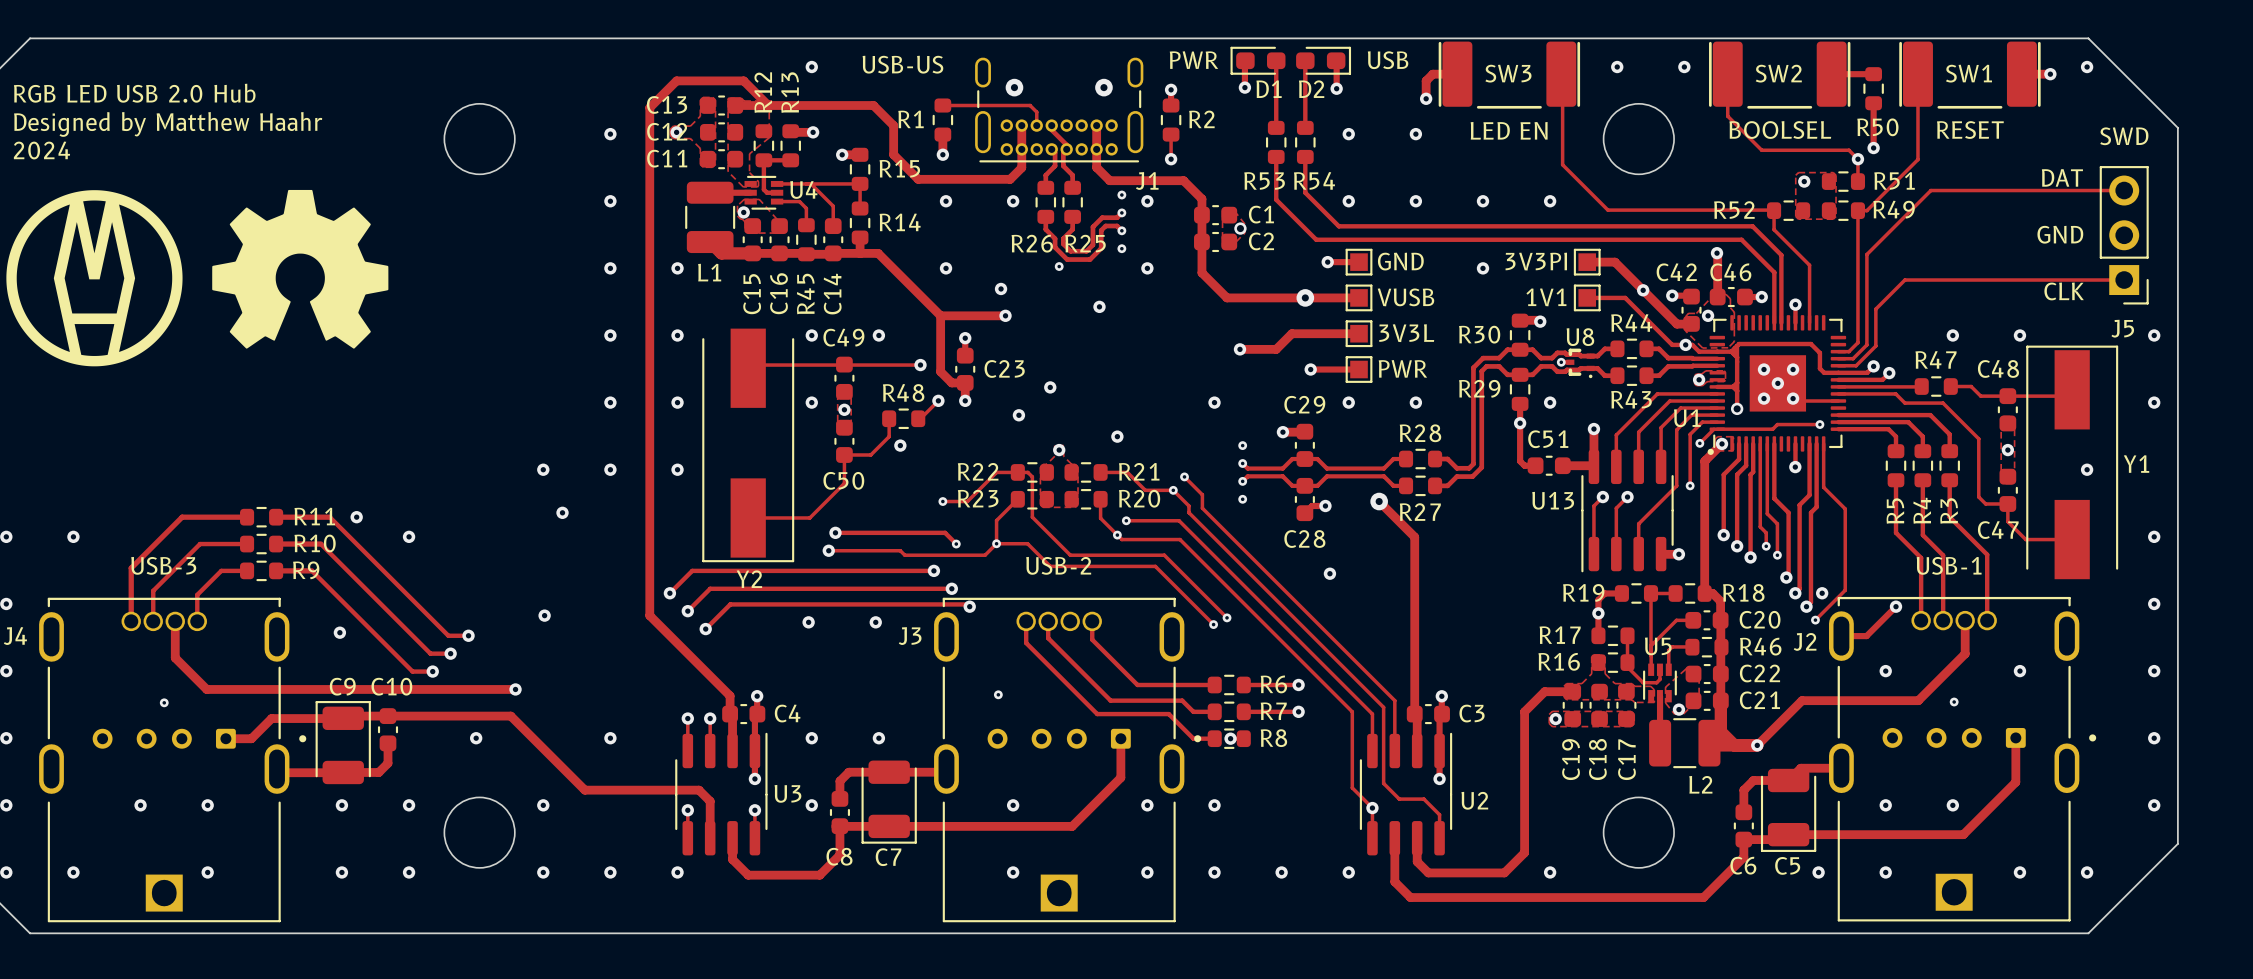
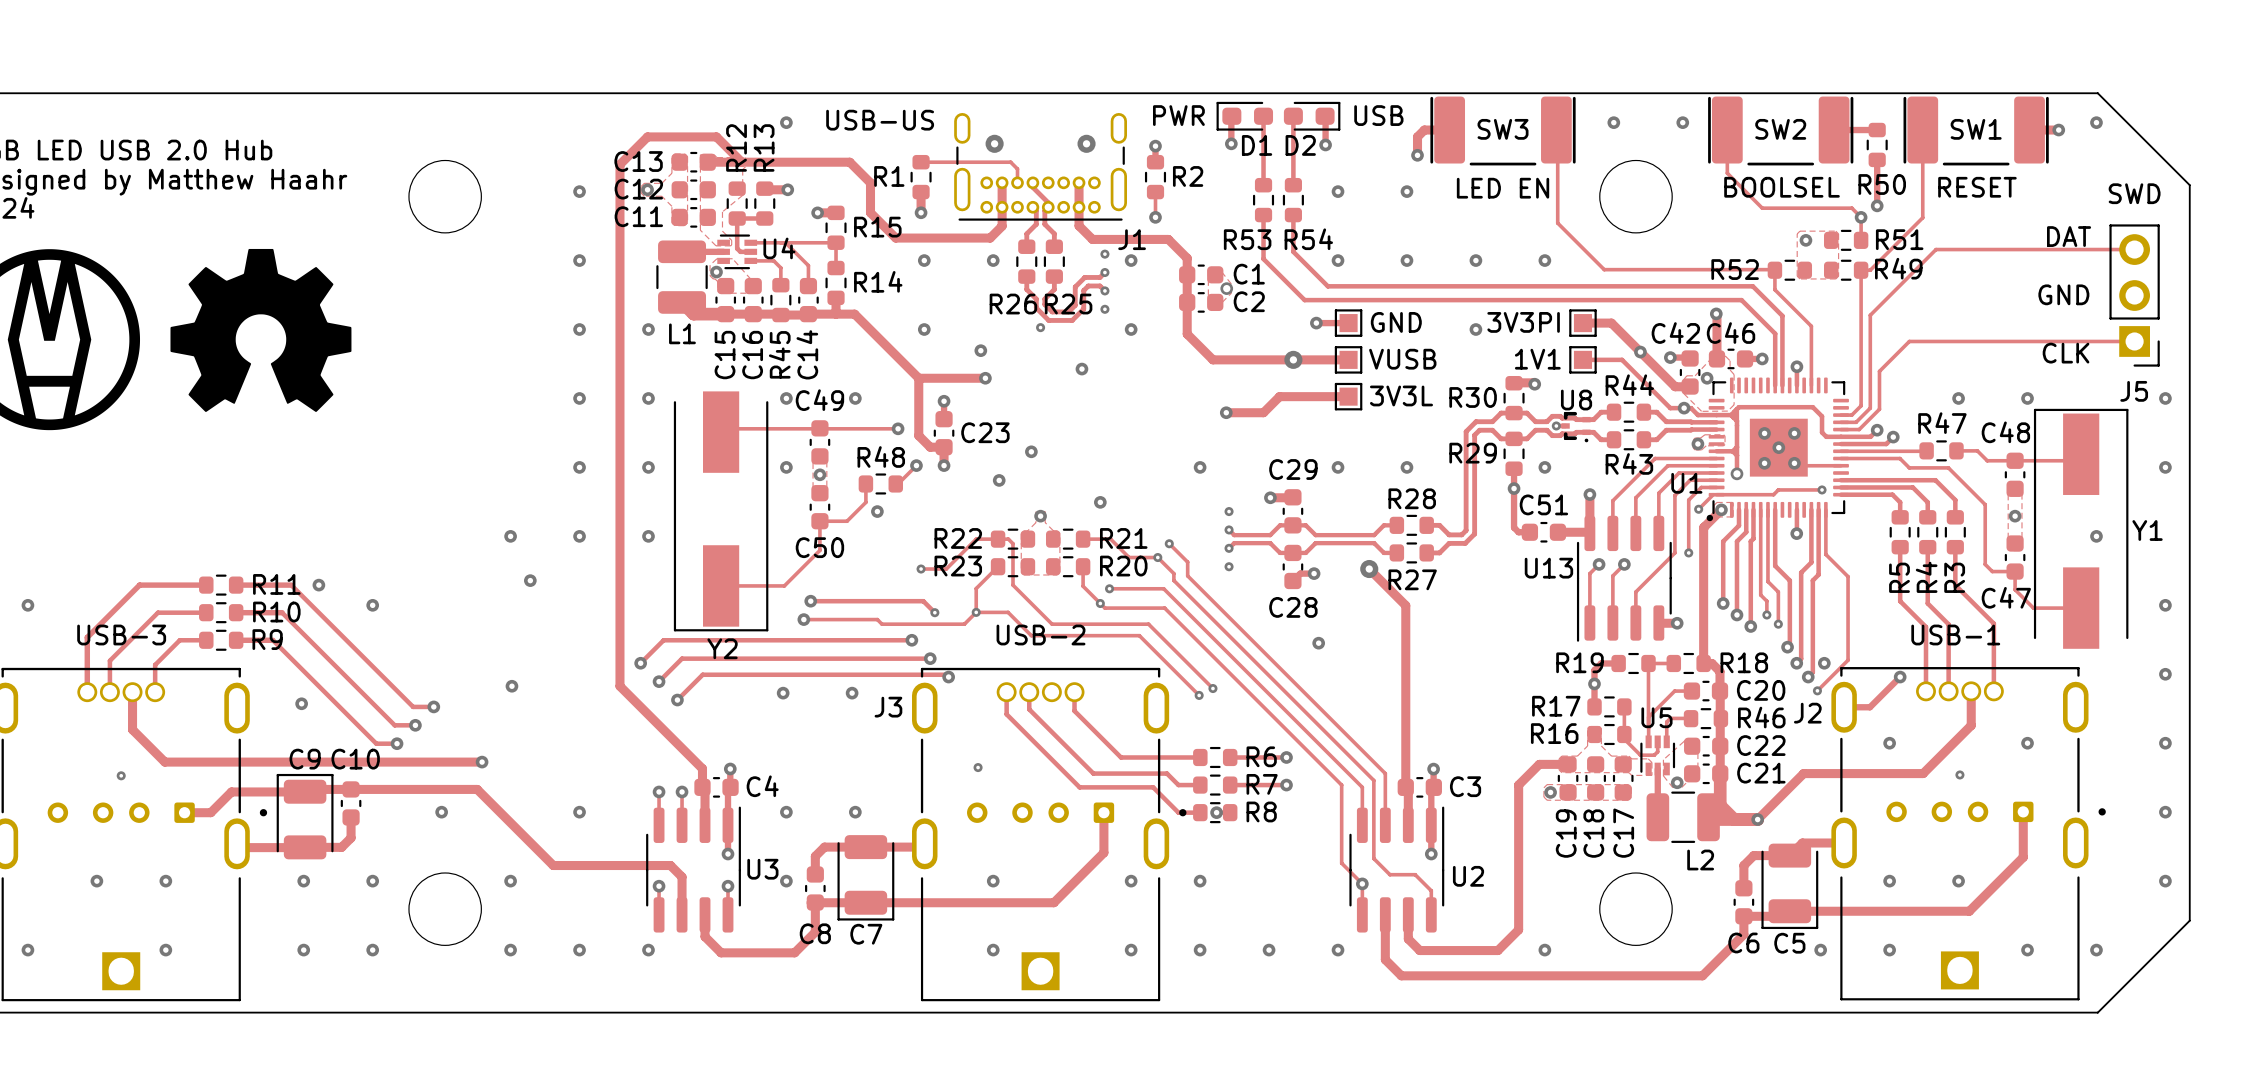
track: (1310, 369) (1359, 369) -> none
via: (1310, 369) -> none
part: PWR (1359, 369) -> none

